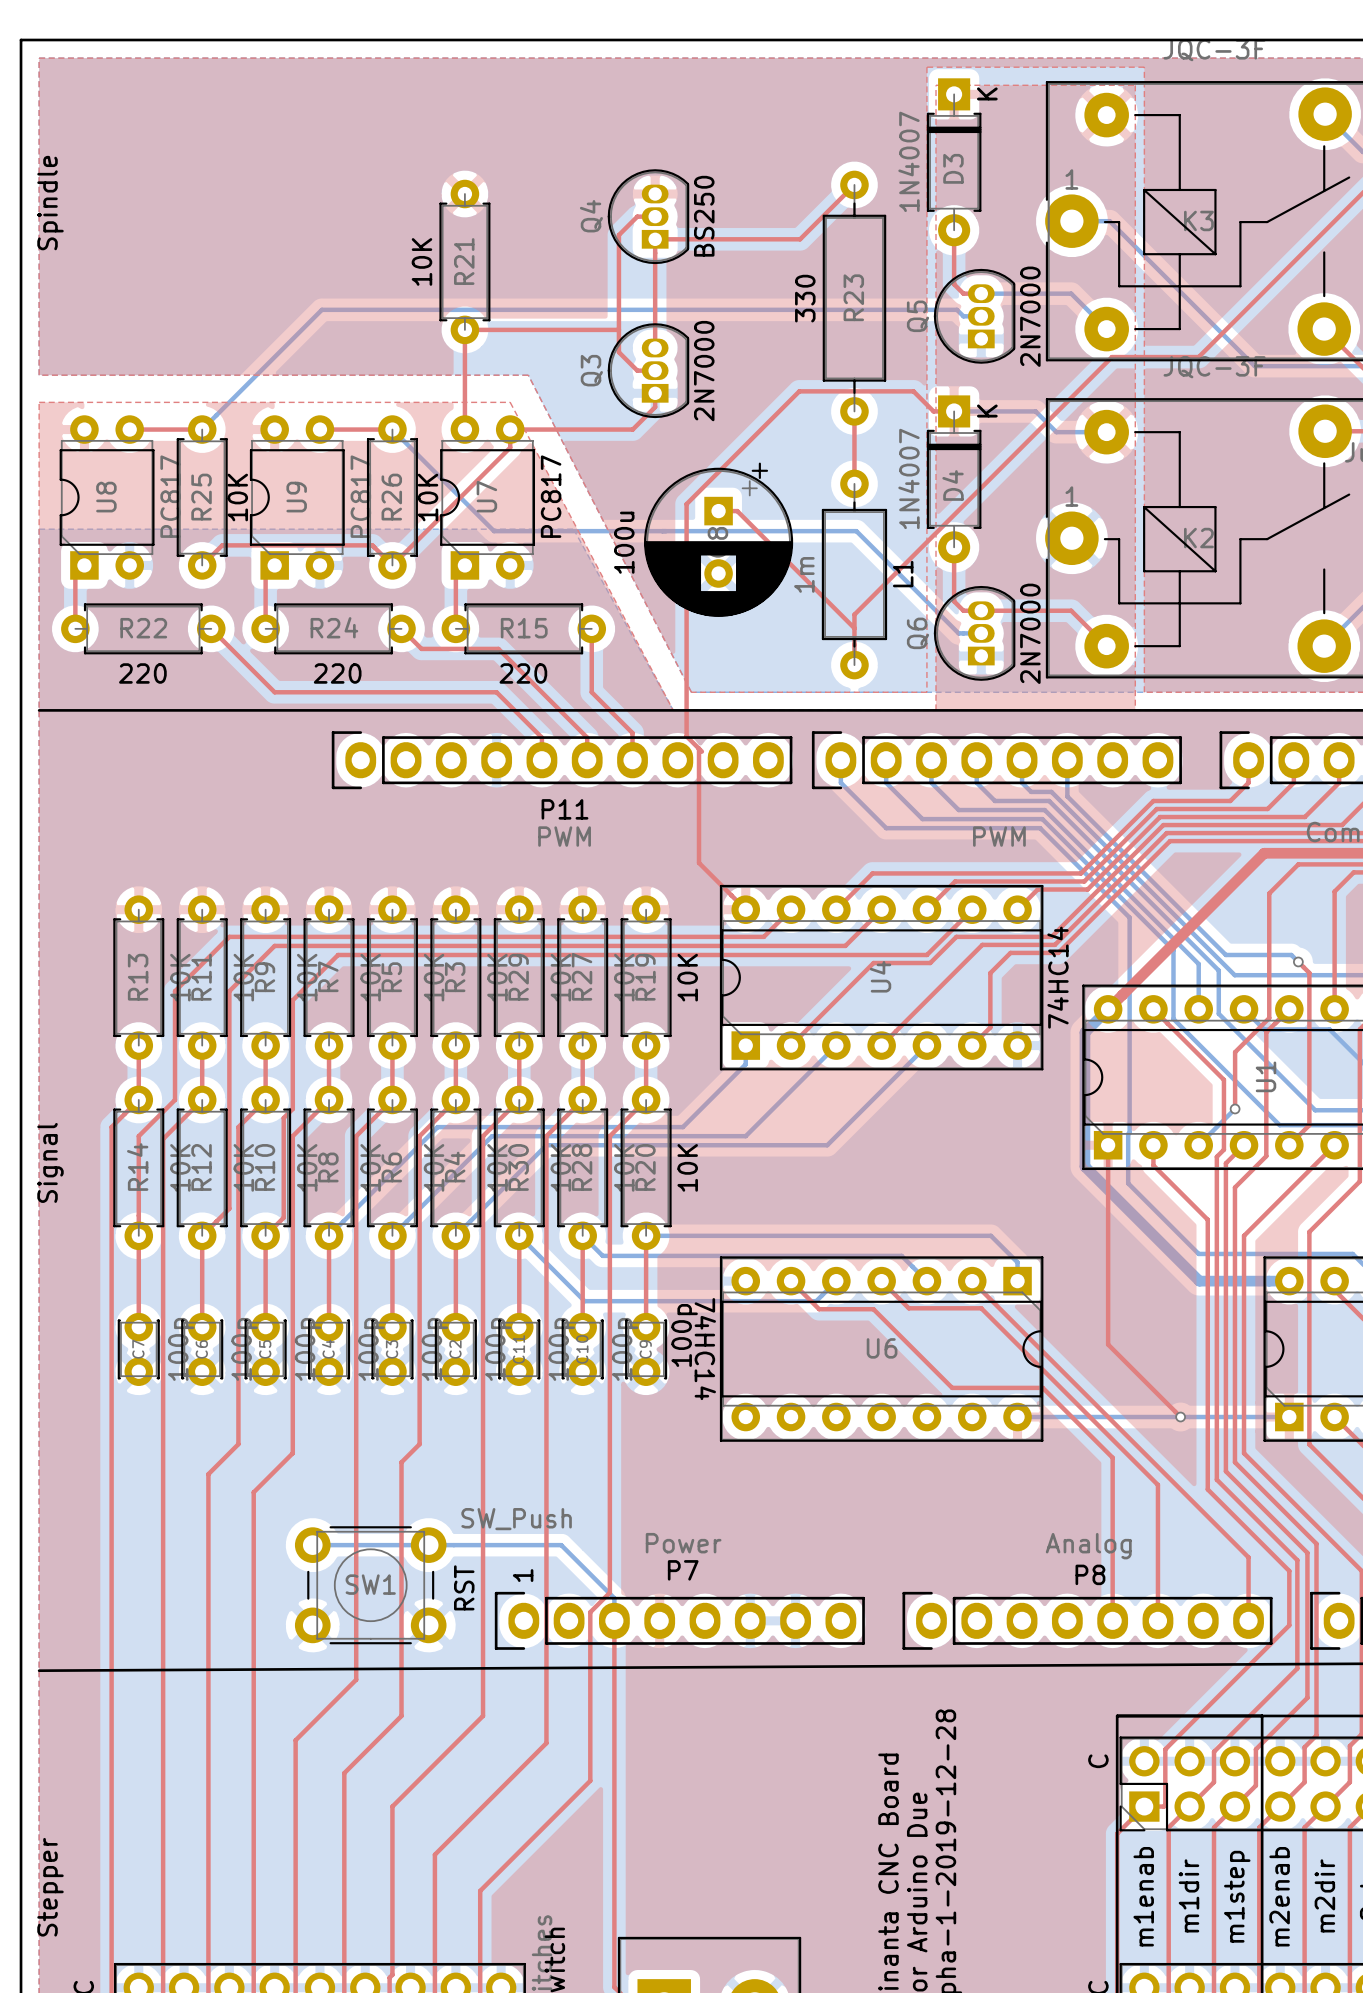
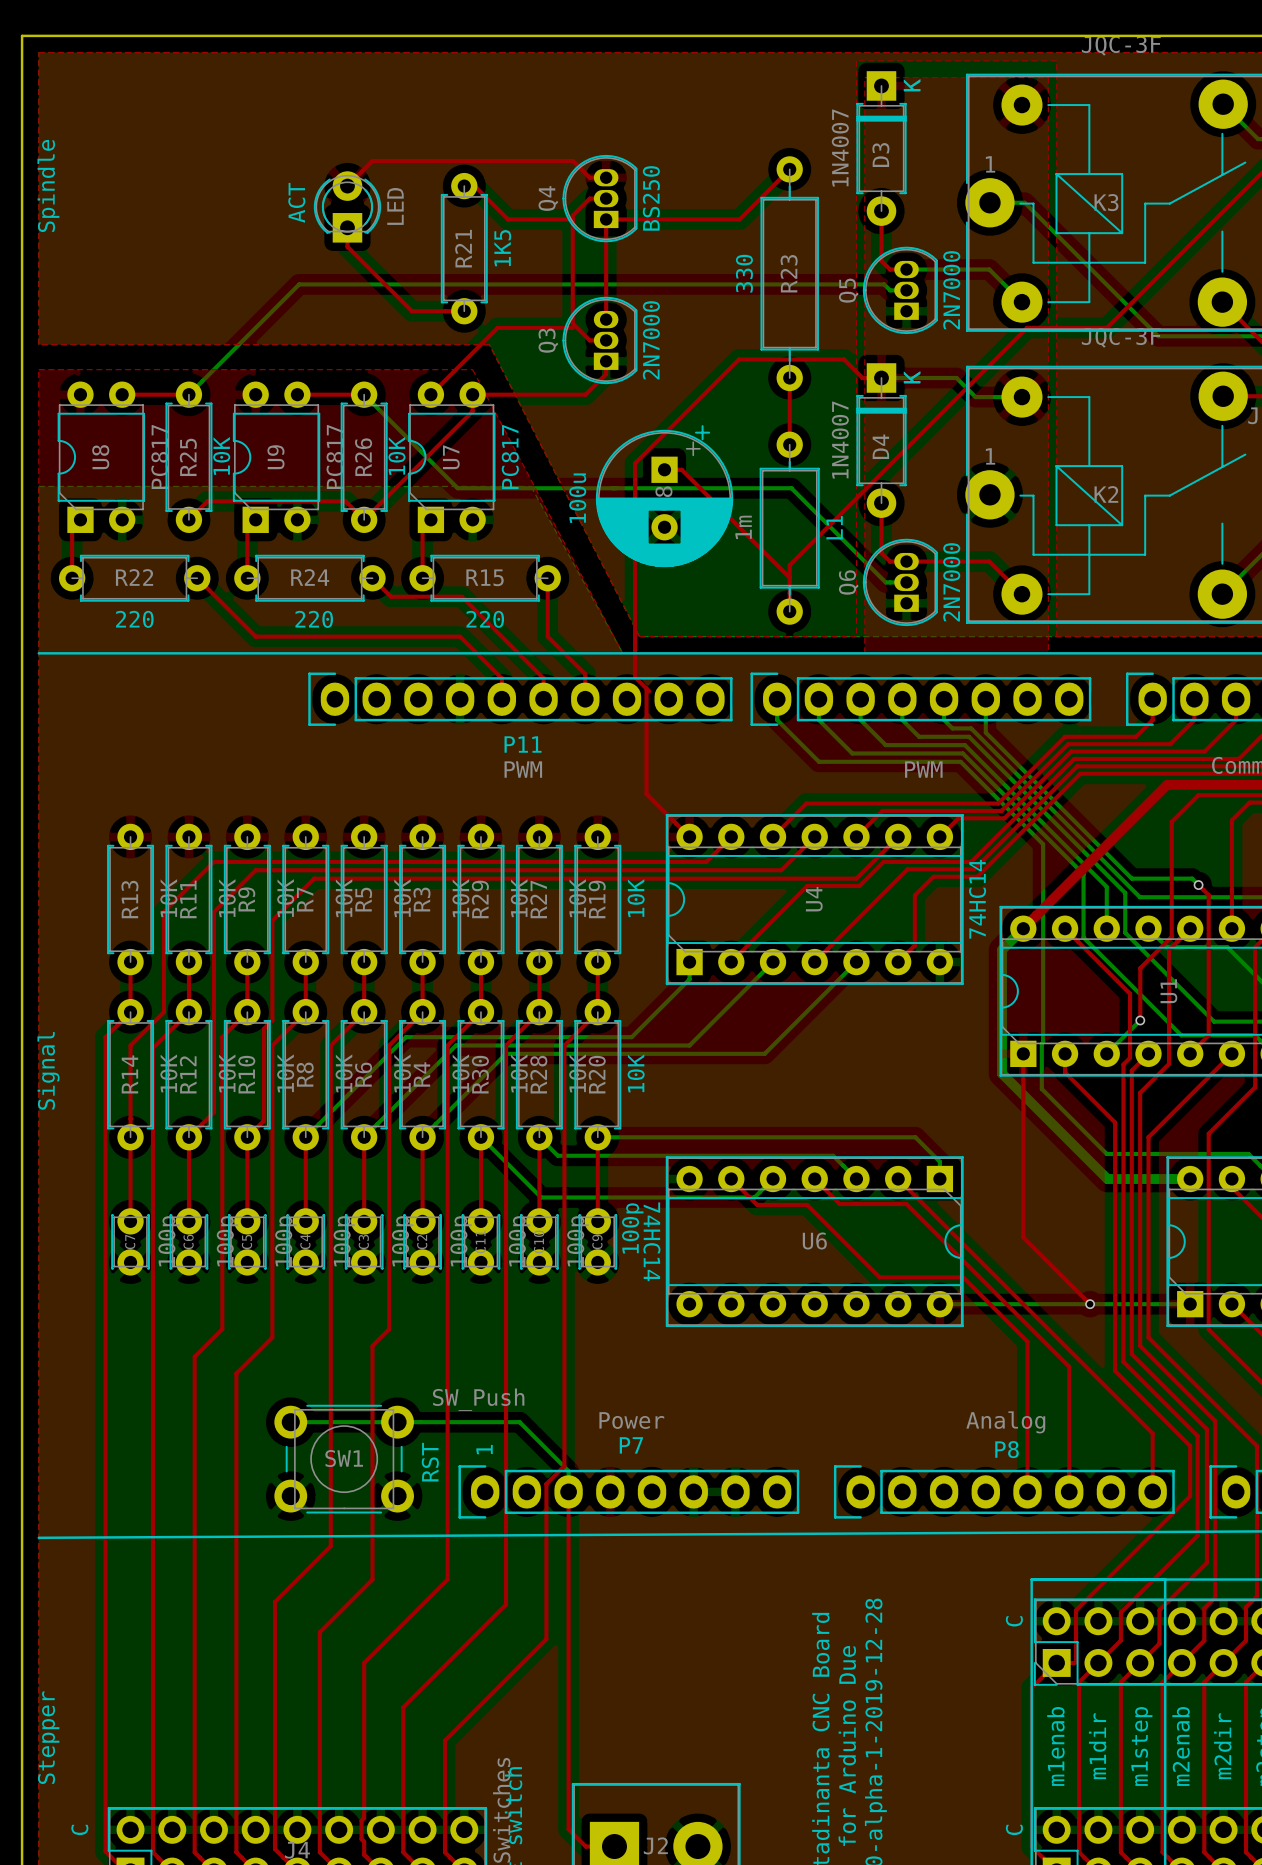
top track: none -> (606, 177) (589, 177) (573, 161) (372, 161) (347, 186)
top track: none -> (469, 180) (508, 219) (572, 219)
text: none -> ACT (296, 202)
part: none -> LED (347, 206)
top track: none -> (347, 227) (347, 246) (412, 311) (464, 311)
R21 value: 10K (421, 261) -> 1K5 (502, 248)
R21 position: (464, 261) -> (464, 248)
top track: (618, 329) (464, 329) (464, 429) -> (572, 327) (497, 327) (430, 394)

